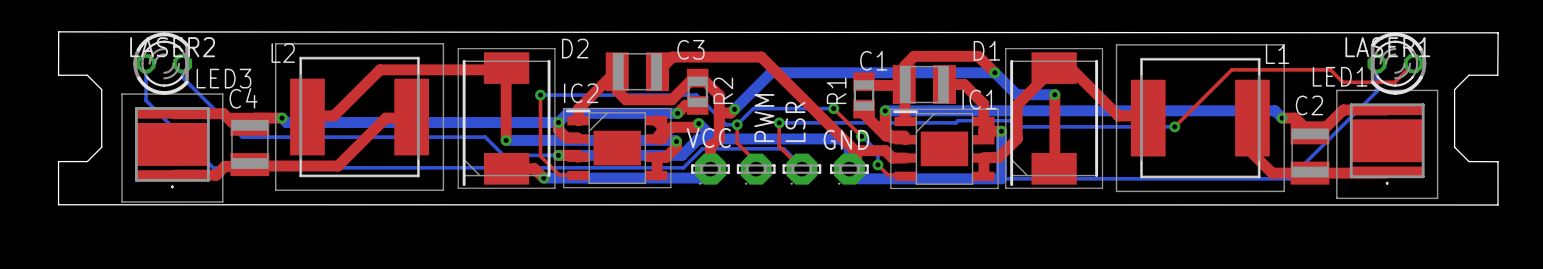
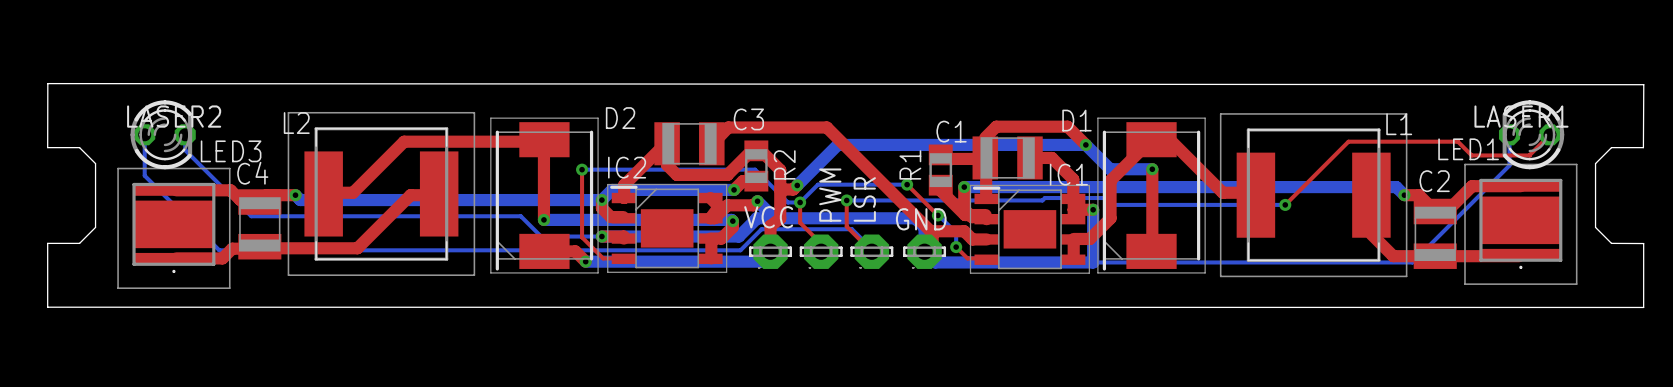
board edge: (58, 75) (58, 31) (1498, 32) (1497, 75) -> (47, 147) (47, 83) (1643, 84) (1643, 147)
board edge: (1498, 161) (1497, 204) (58, 204) -> (1643, 243) (1643, 307) (47, 307) (47, 291)

